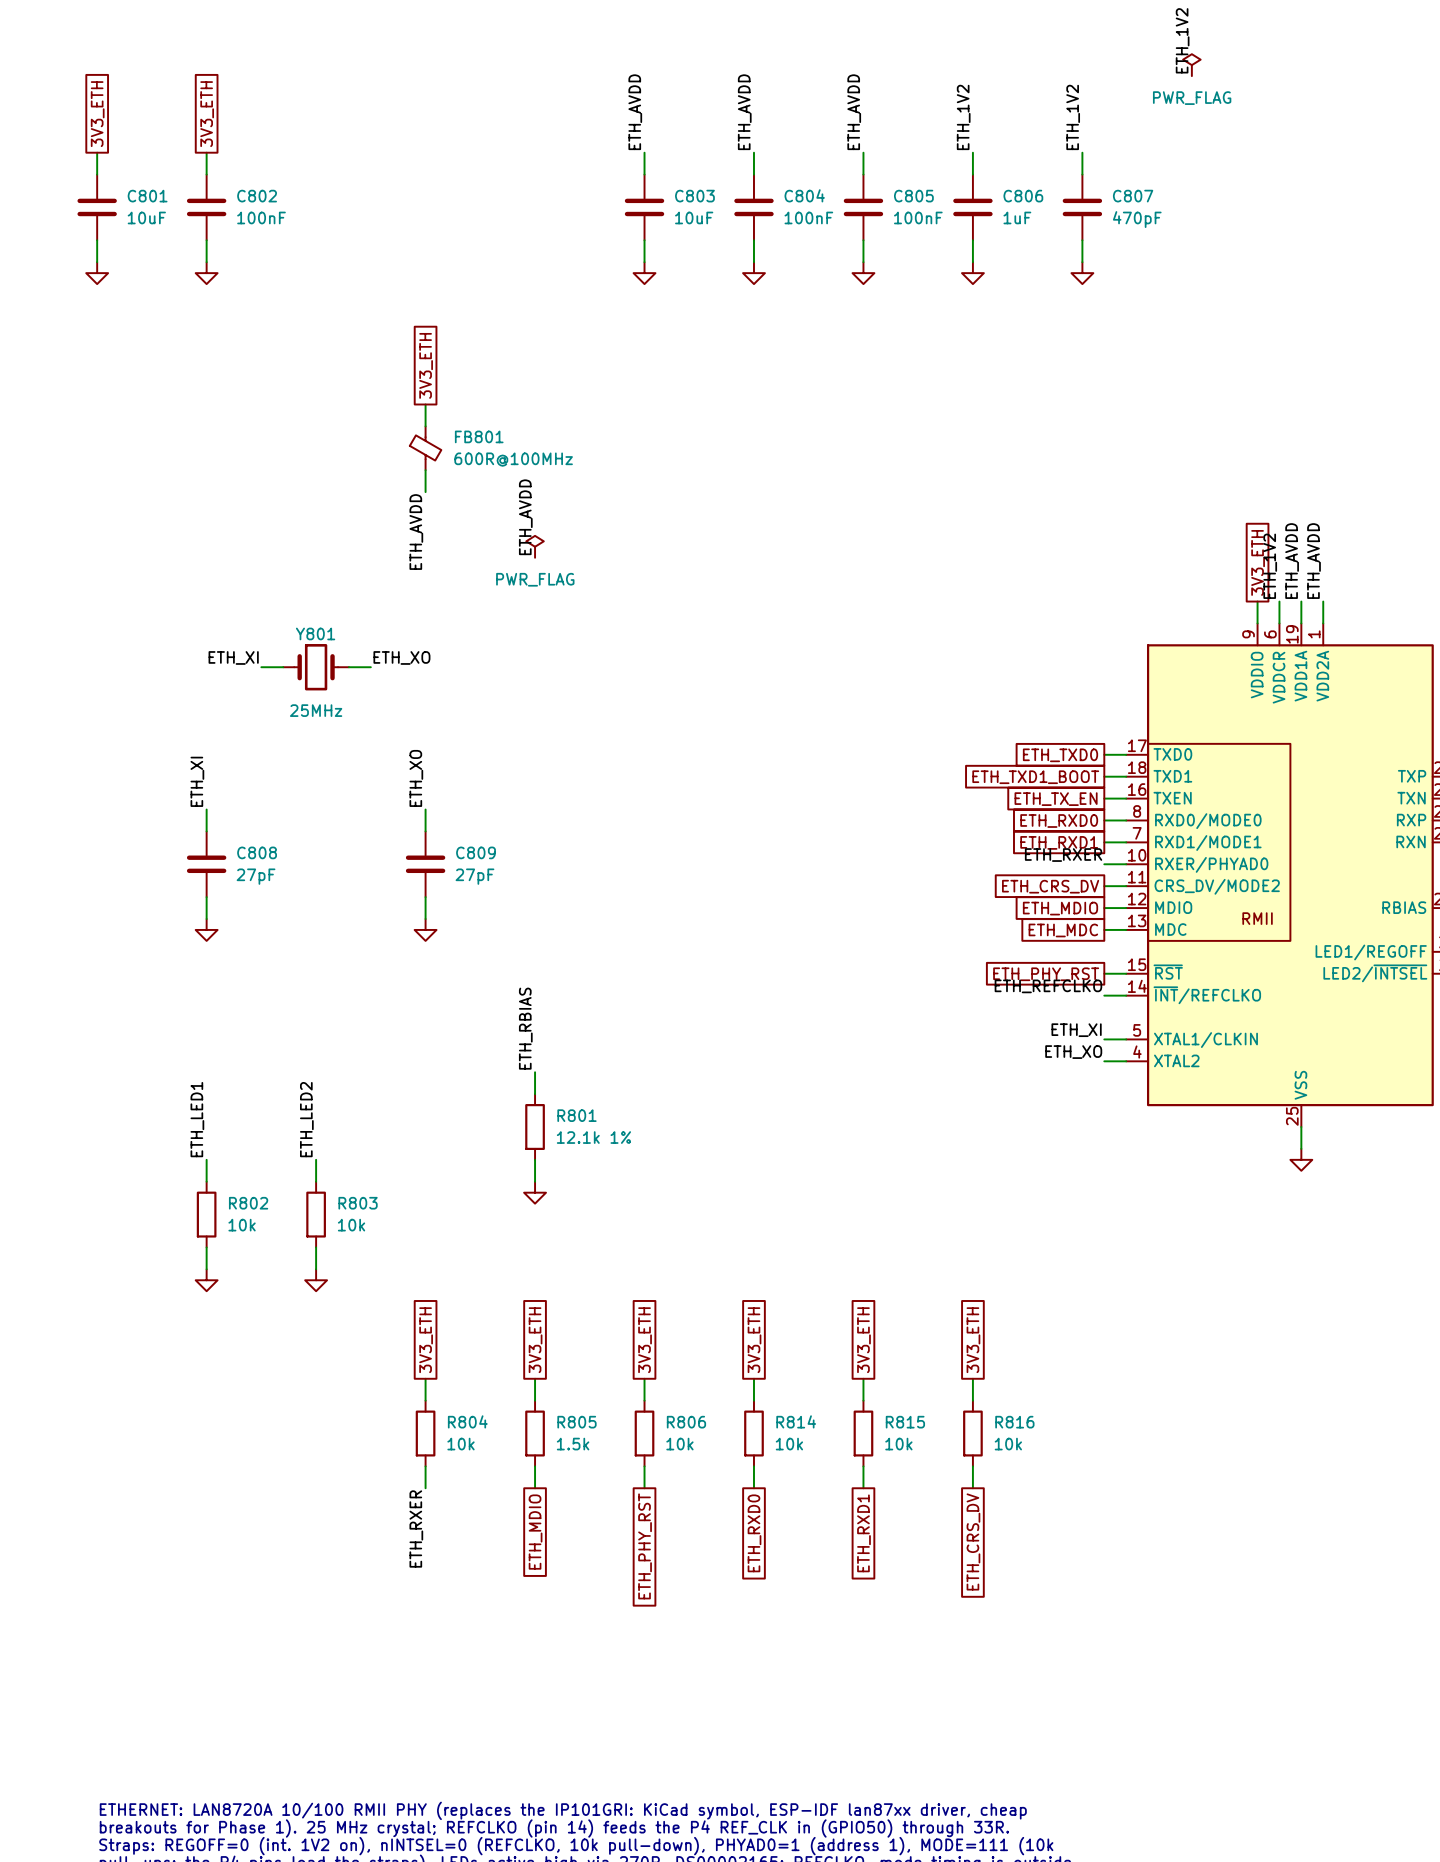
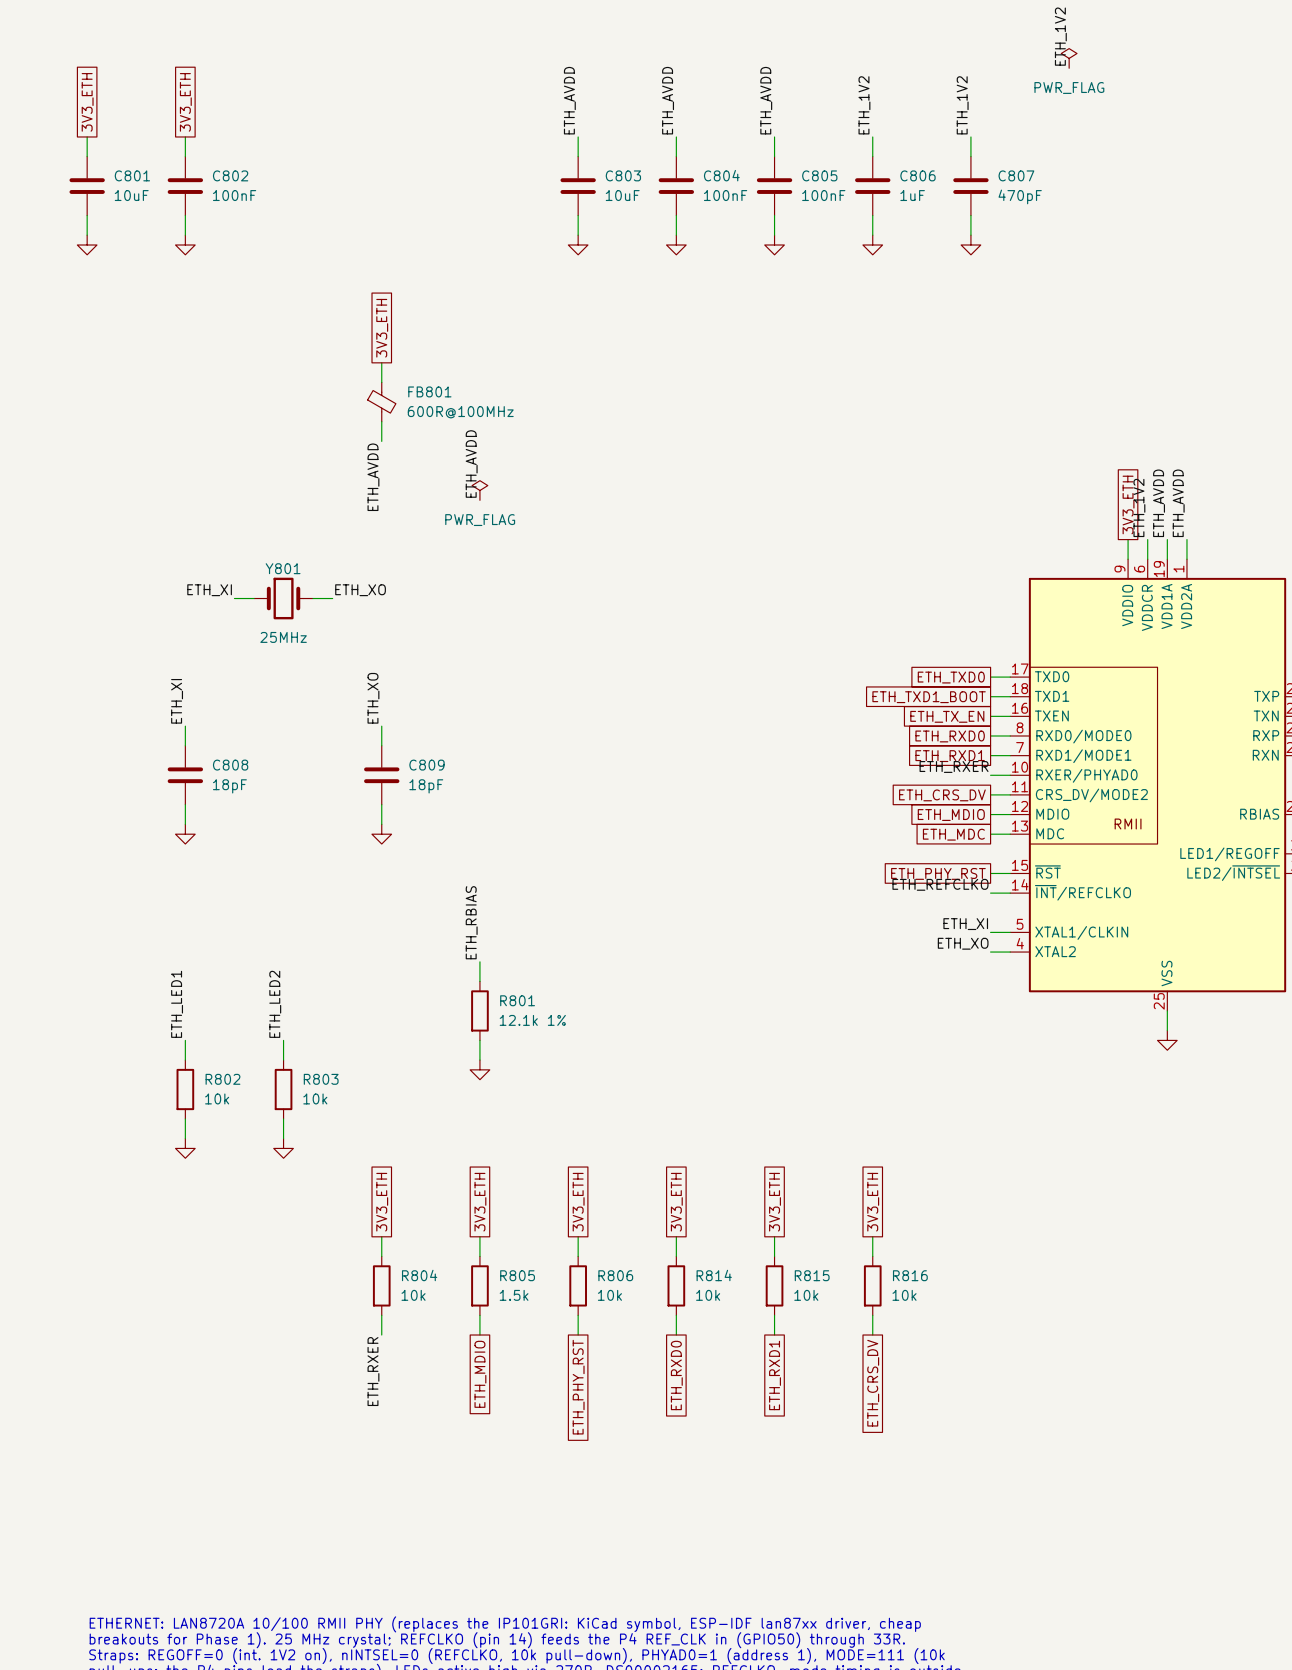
C808 value: 27pF (256, 876) -> 18pF (229, 786)
C809 value: 27pF (474, 876) -> 18pF (426, 786)

